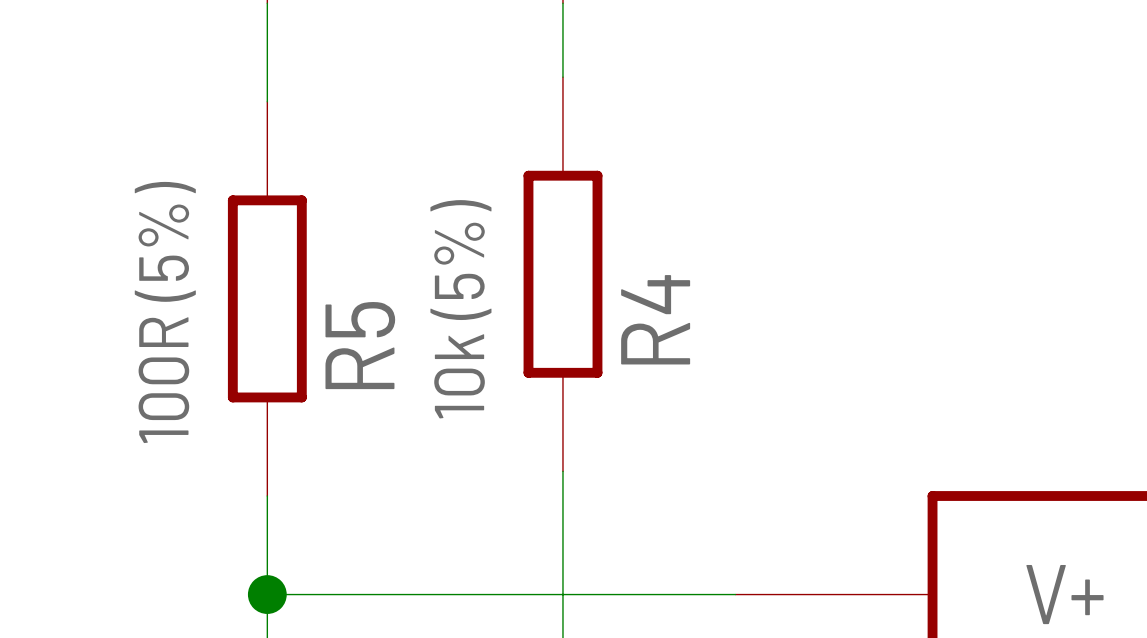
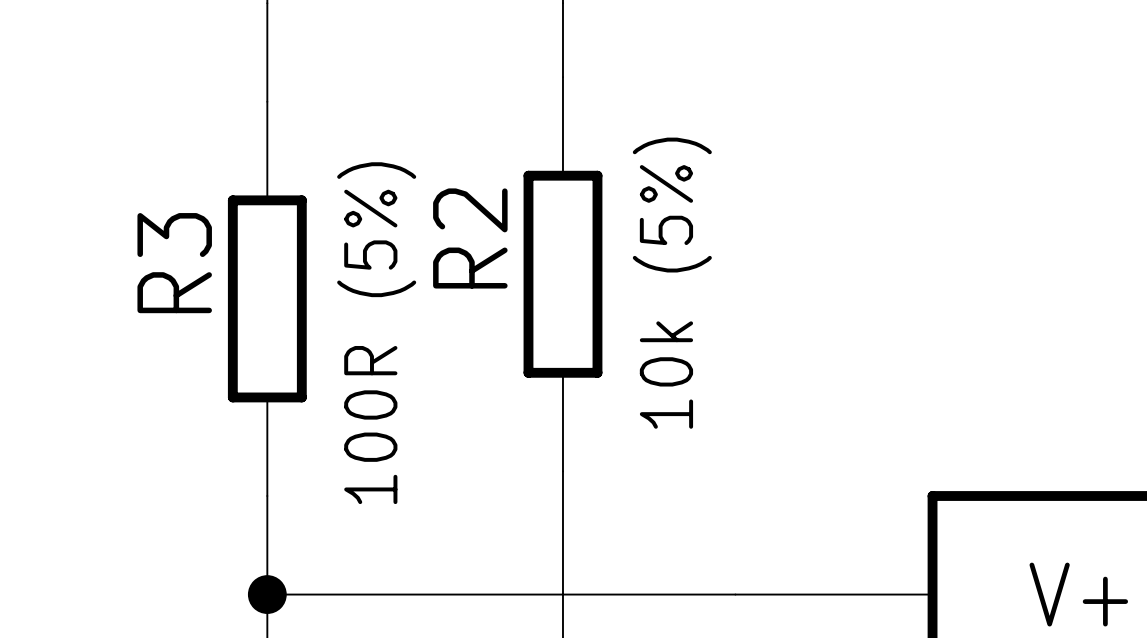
R4 value position: 10k (5%) (460, 309) -> 10k (5%) (672, 283)
R5 value position: 100R (5%) (165, 312) -> 100R (5%) (376, 333)
R4 name: R4 (655, 319) -> R2 (470, 238)
R5 name: R5 (360, 345) -> R3 (174, 263)

